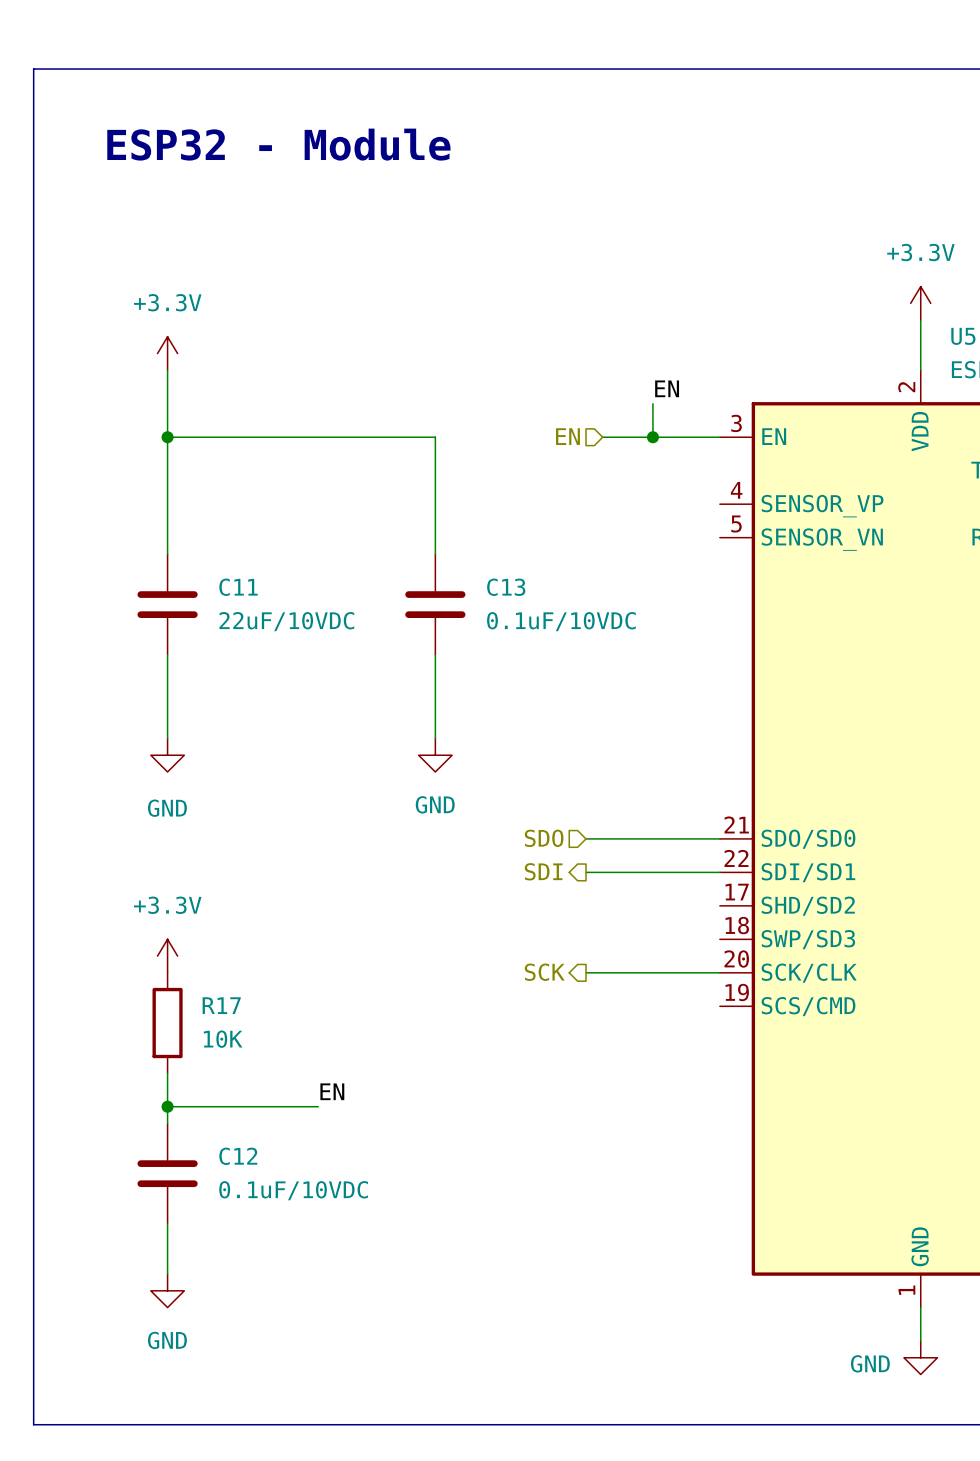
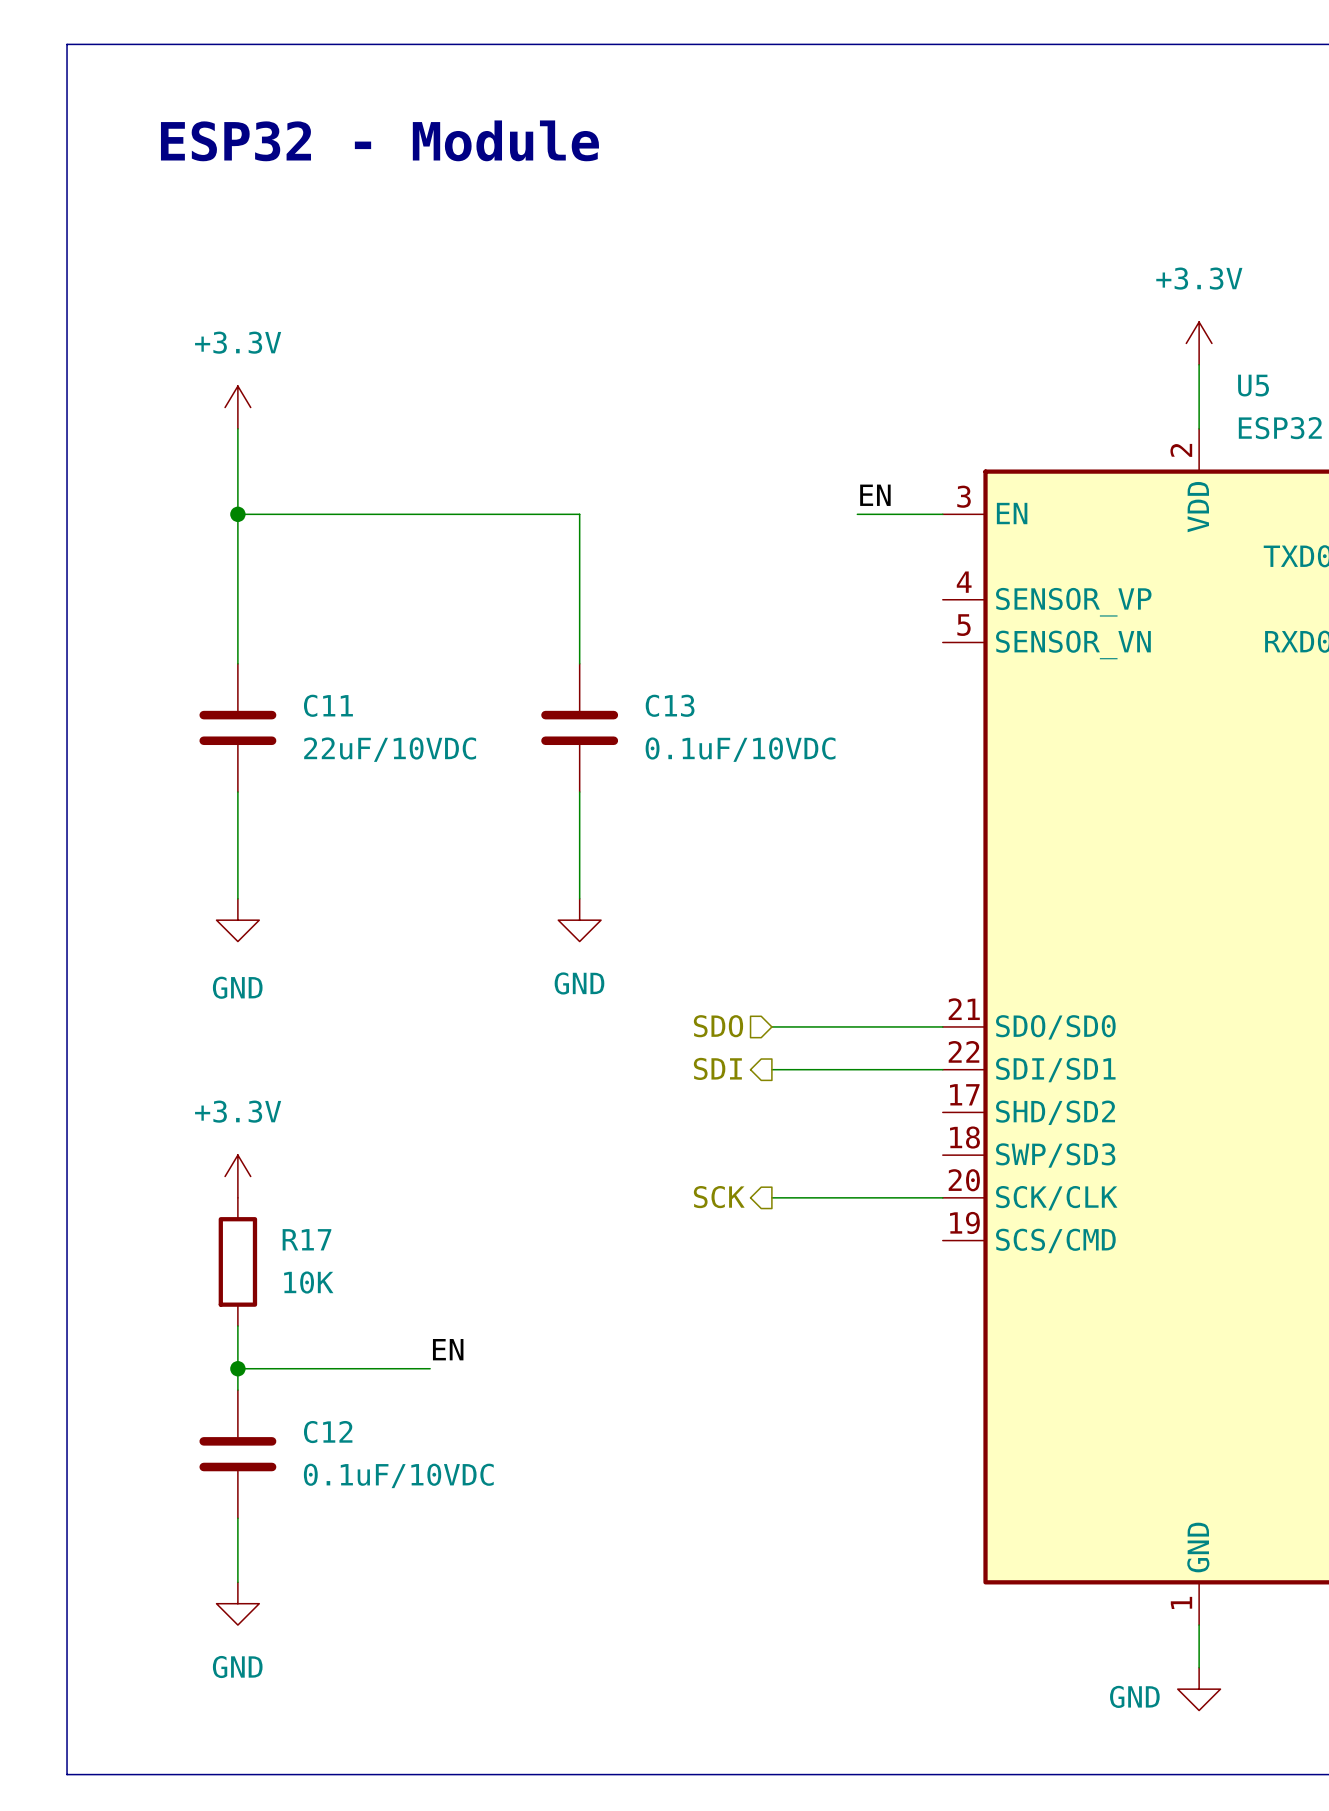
label position: EN (667, 388) -> EN (875, 495)
wire: (652, 403) (652, 437) (602, 437) -> none
hierarchical label: EN (567, 436) -> none
junction: (652, 437) -> none

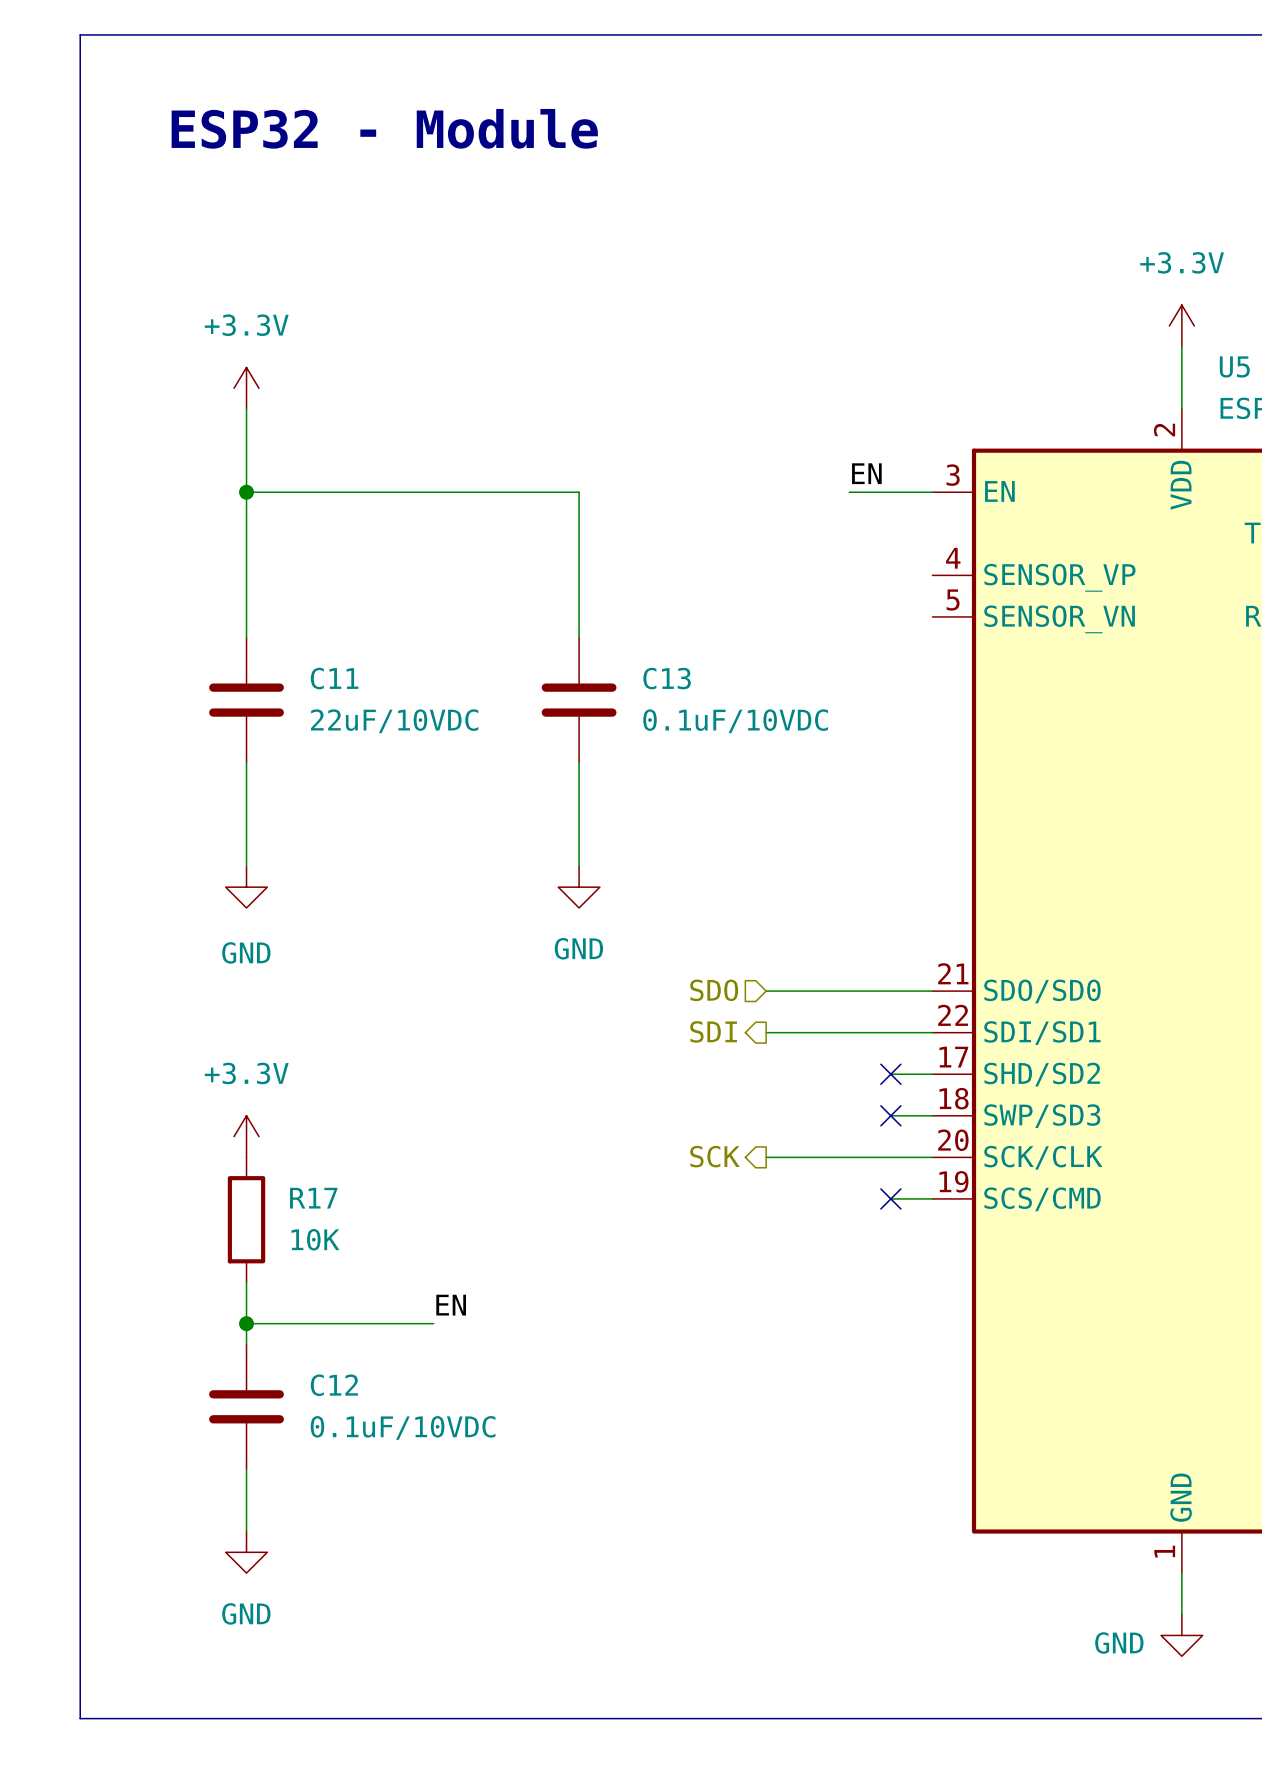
wire: none -> (890, 1074) (932, 1074)
no-connect mark: none -> (890, 1074)
wire: none -> (890, 1115) (932, 1115)
no-connect mark: none -> (890, 1115)
wire: none -> (890, 1198) (932, 1198)
no-connect mark: none -> (890, 1198)

